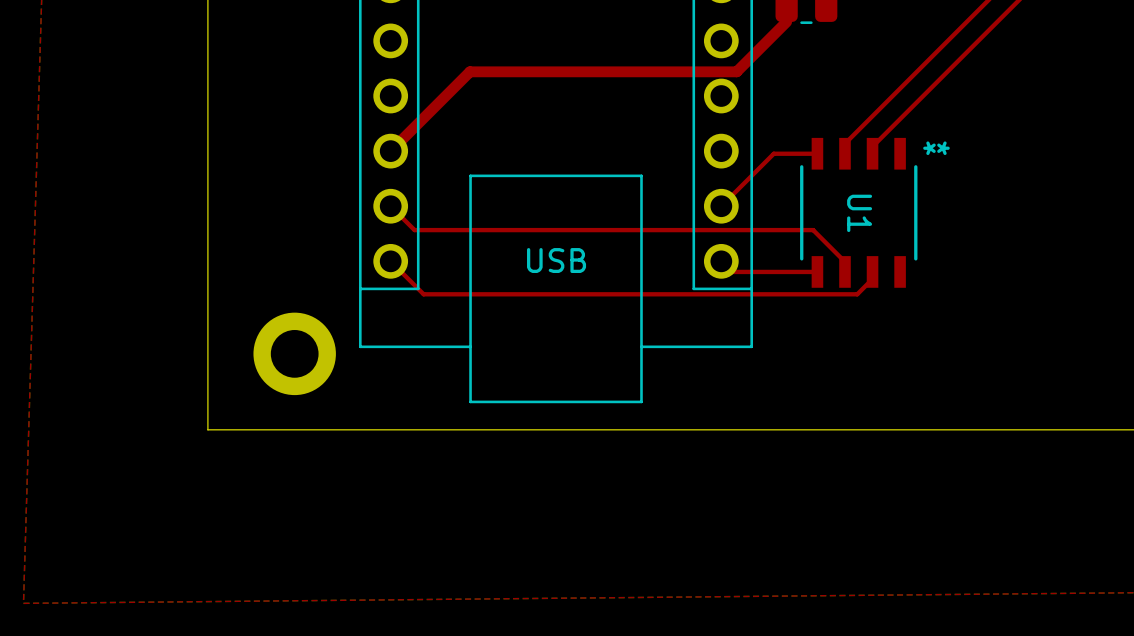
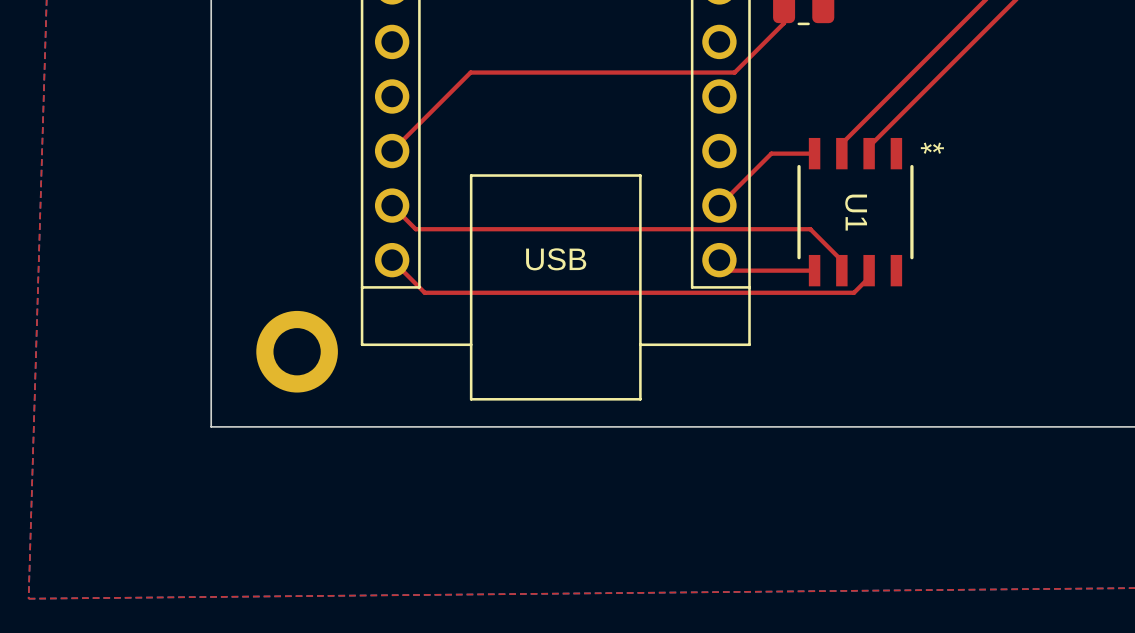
top track width: thick (786, 21) (736, 71) (469, 71) (390, 151) -> thin (784, 23) (734, 72) (470, 72) (392, 151)

